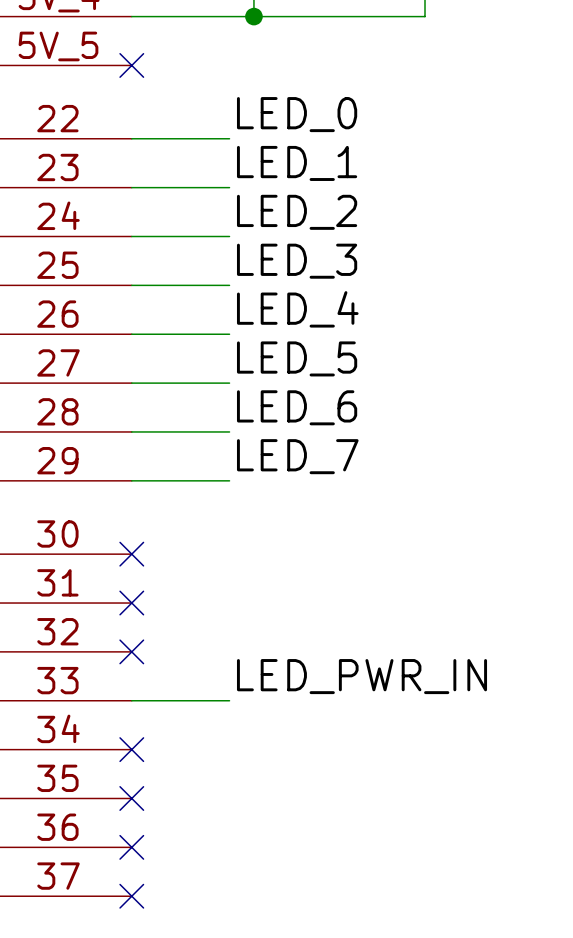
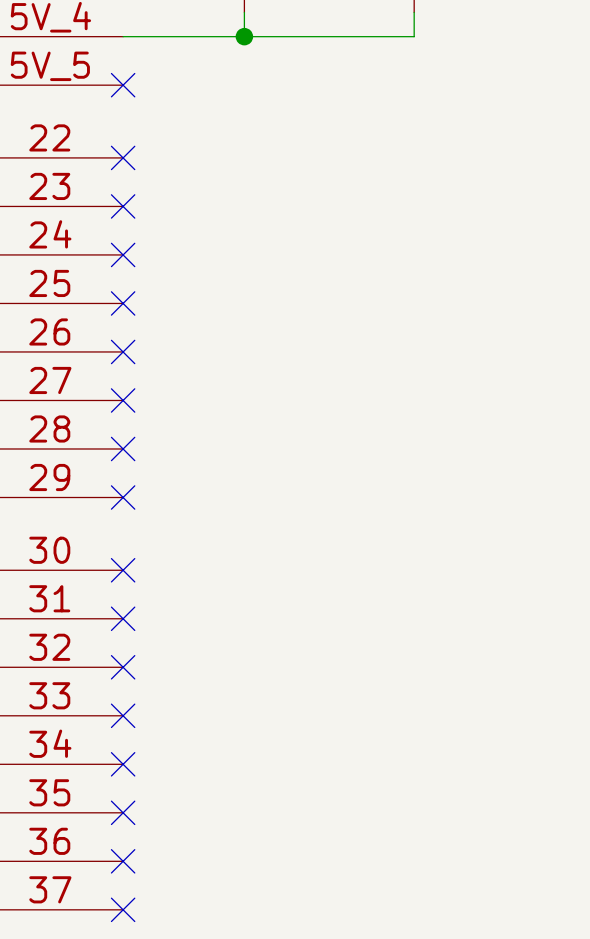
label: LED_0 (297, 114) -> none
wire: (131, 138) (229, 138) -> none
no-connect mark: none -> (123, 157)
label: LED_1 (297, 163) -> none
wire: (131, 187) (229, 187) -> none
no-connect mark: none -> (123, 206)
label: LED_2 (297, 212) -> none
wire: (131, 236) (229, 236) -> none
no-connect mark: none -> (123, 254)
label: LED_3 (297, 261) -> none
wire: (131, 285) (229, 285) -> none
no-connect mark: none -> (123, 303)
label: LED_4 (297, 309) -> none
wire: (131, 334) (229, 334) -> none
no-connect mark: none -> (123, 351)
label: LED_5 (297, 358) -> none
wire: (131, 383) (229, 383) -> none
no-connect mark: none -> (123, 400)
label: LED_6 (297, 407) -> none
wire: (131, 431) (229, 431) -> none
no-connect mark: none -> (123, 448)
label: LED_7 (297, 456) -> none
wire: (131, 480) (229, 480) -> none
no-connect mark: none -> (123, 497)
label: LED_PWR_IN (362, 676) -> none
wire: (131, 700) (229, 700) -> none
no-connect mark: none -> (123, 715)

